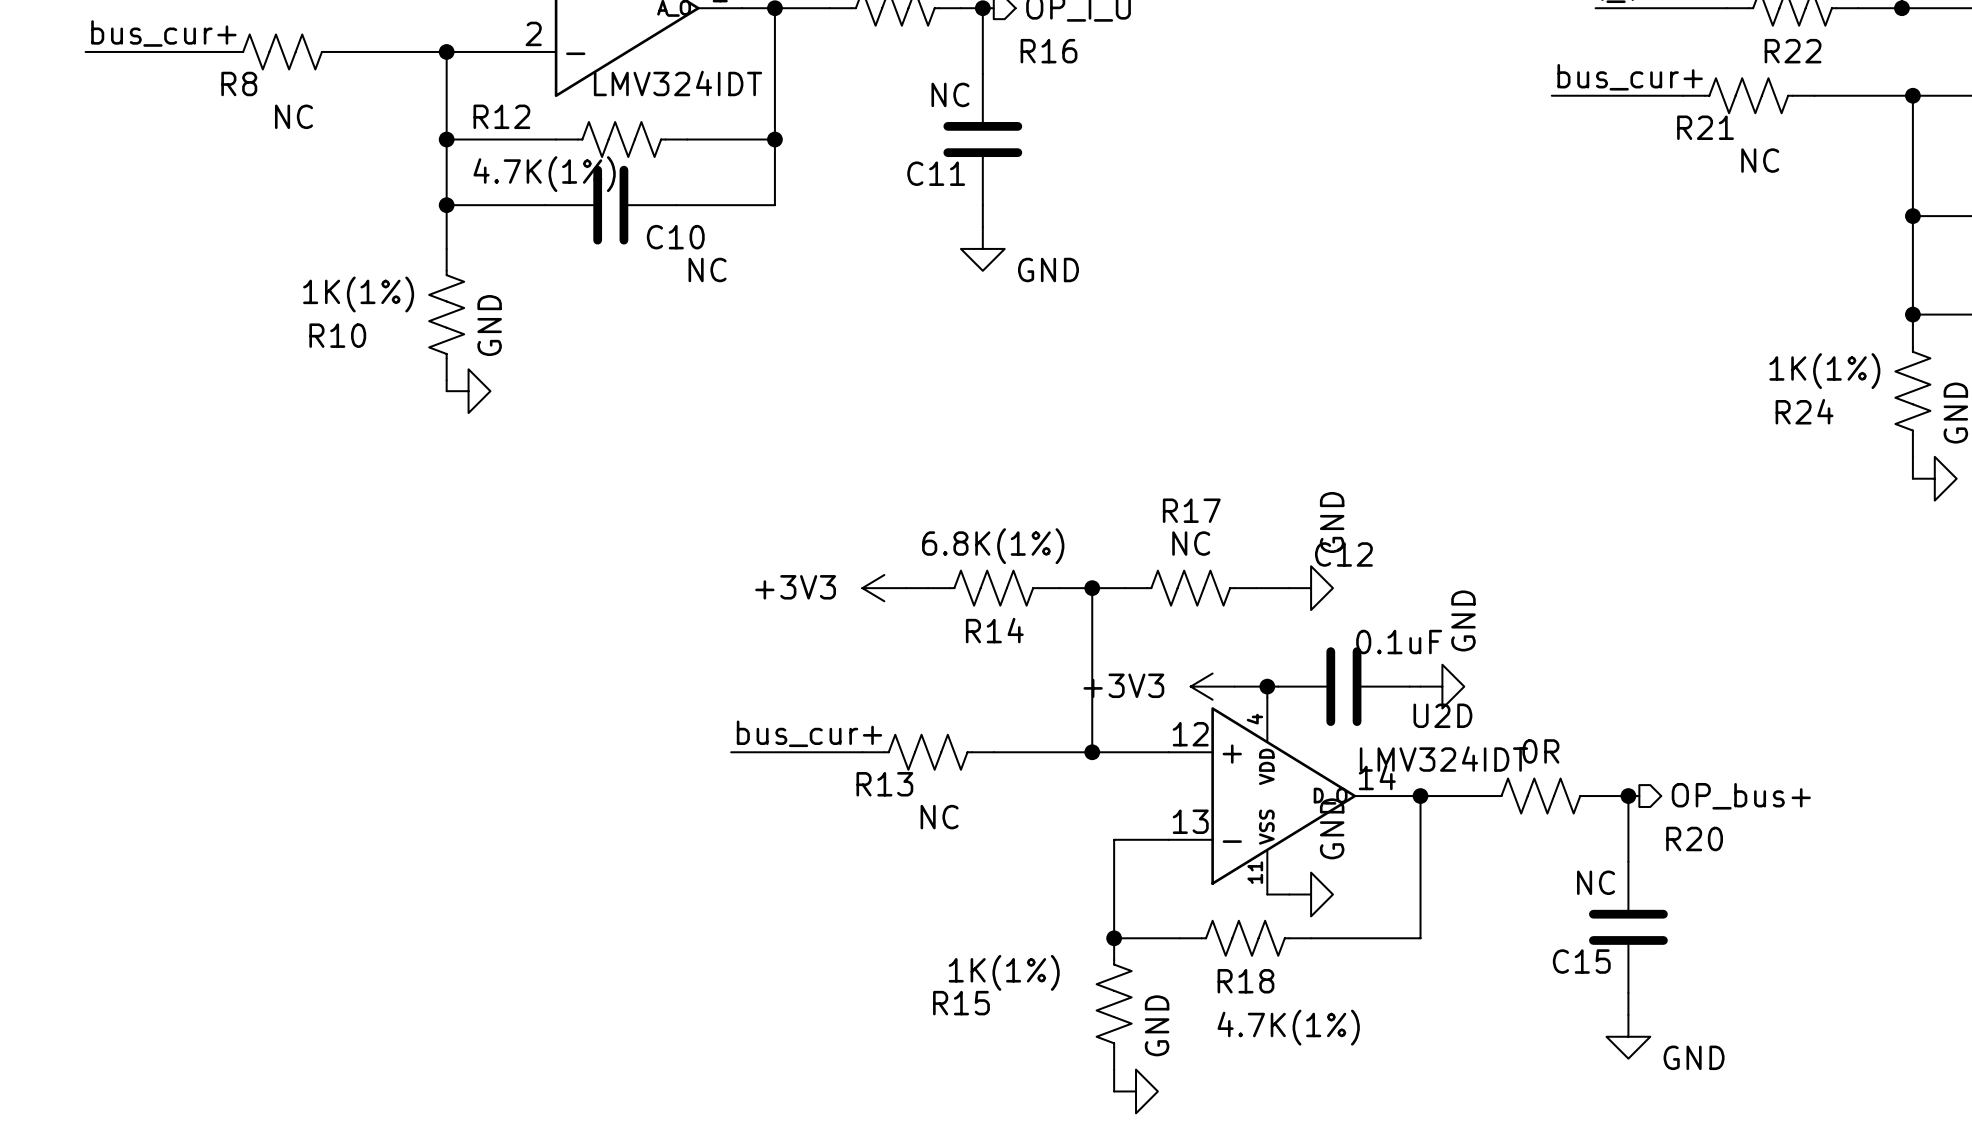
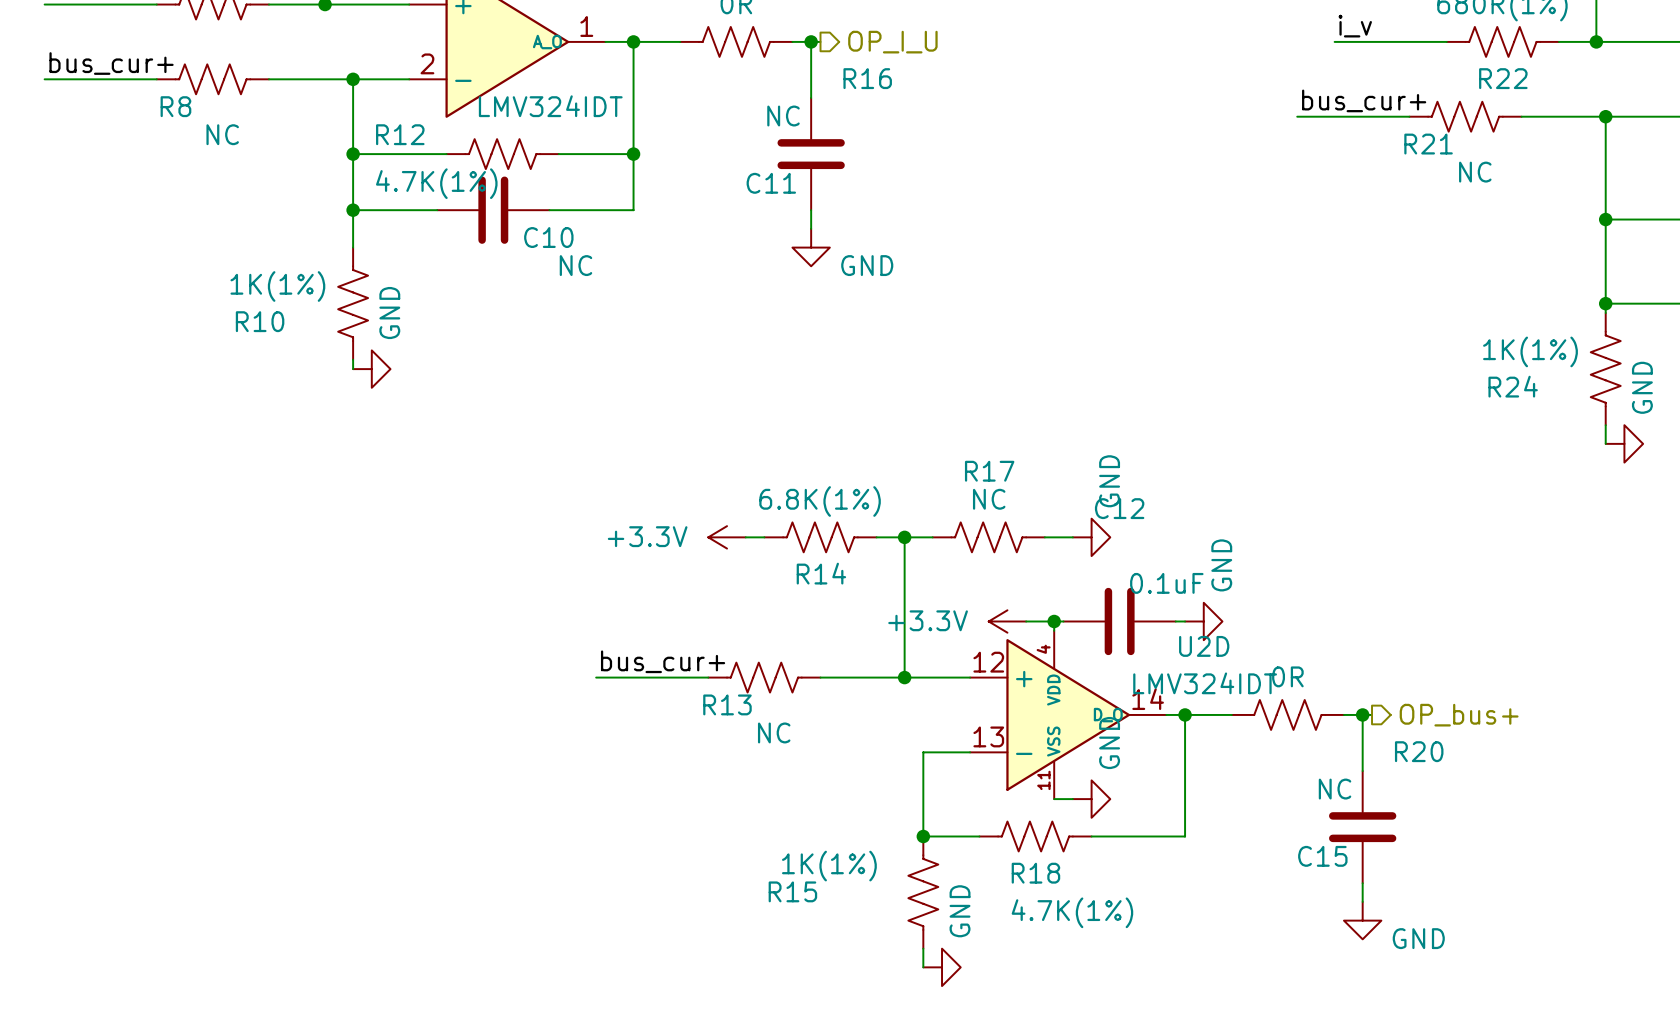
power symbol: +3V3 (884, 588) -> +3.3V (727, 537)
power symbol: +3V3 (1212, 686) -> +3.3V (1007, 621)

